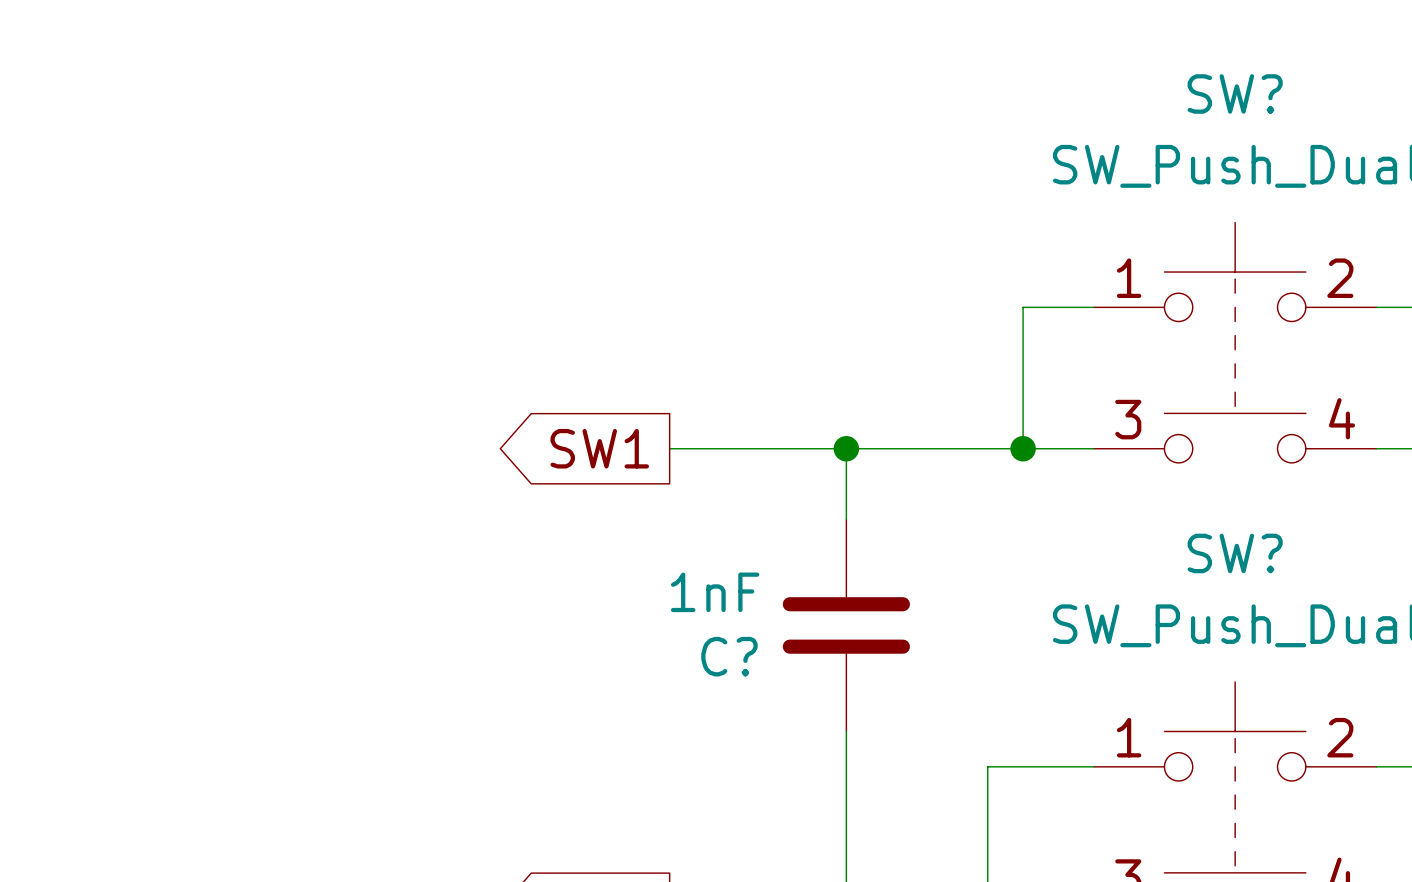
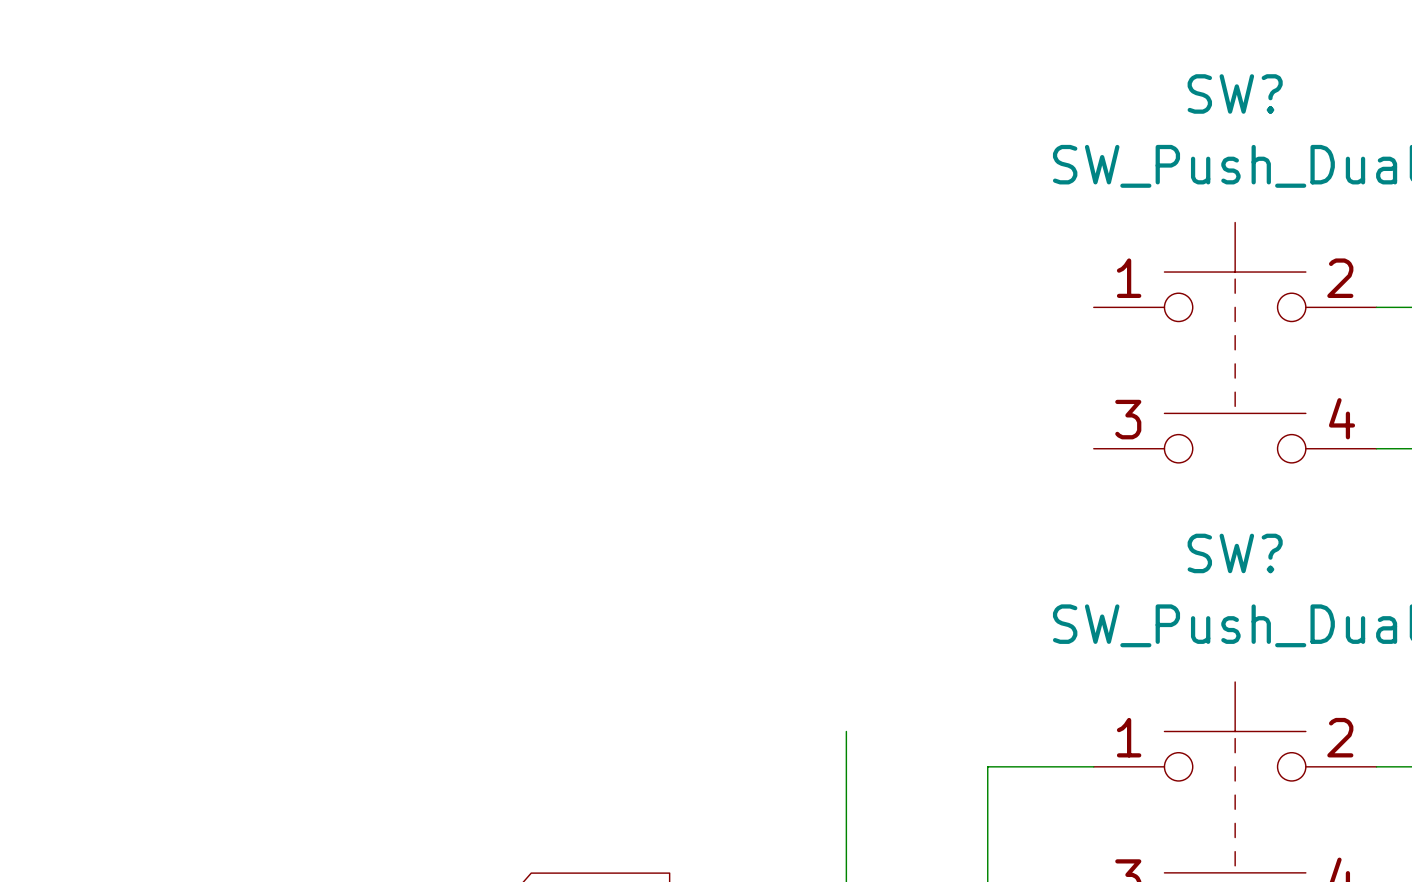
wire: (1093, 307) (1023, 307) (1023, 448) -> none
global label: SW1 (599, 448) -> none
wire: (669, 448) (1093, 448) -> none
wire: (846, 448) (846, 519) -> none
junction: (846, 448) -> none
junction: (1023, 448) -> none
C?: 1nF (846, 625) -> none

